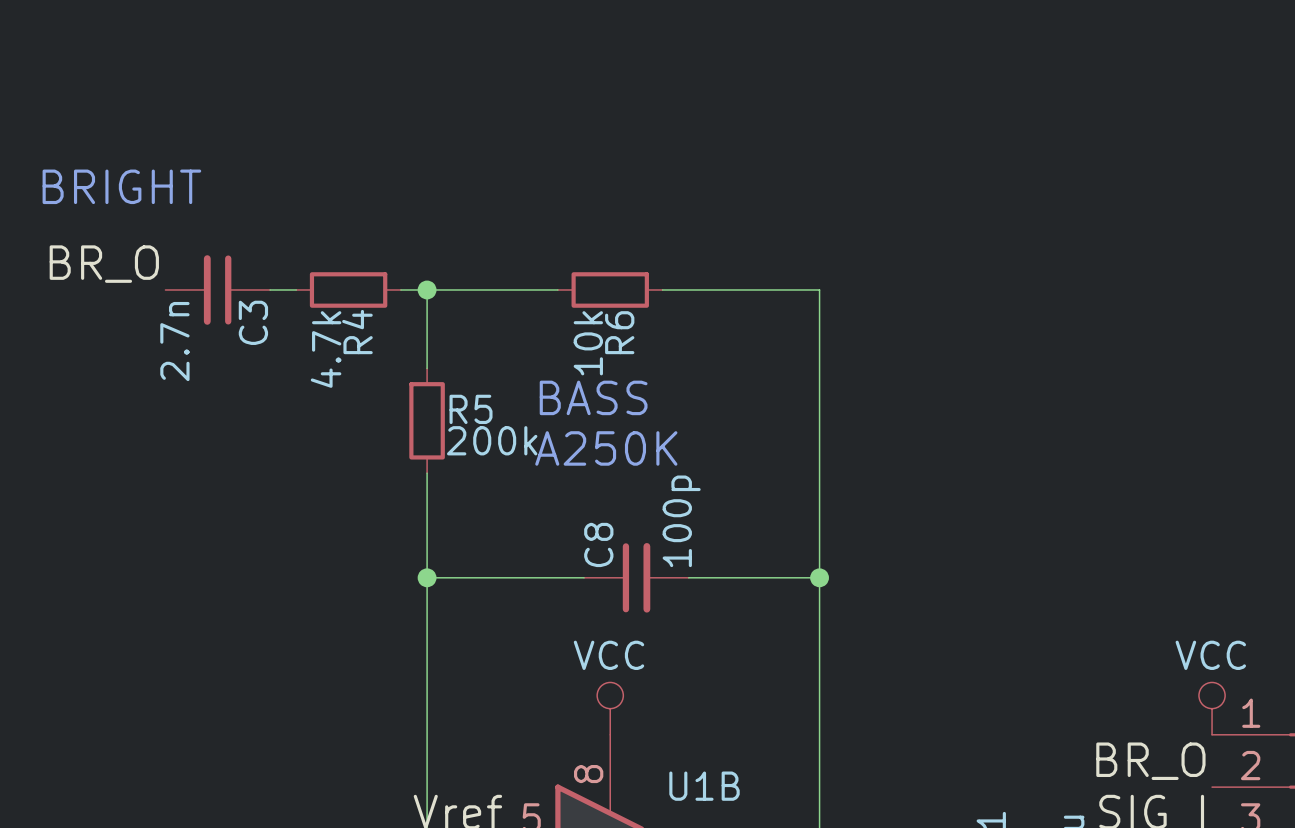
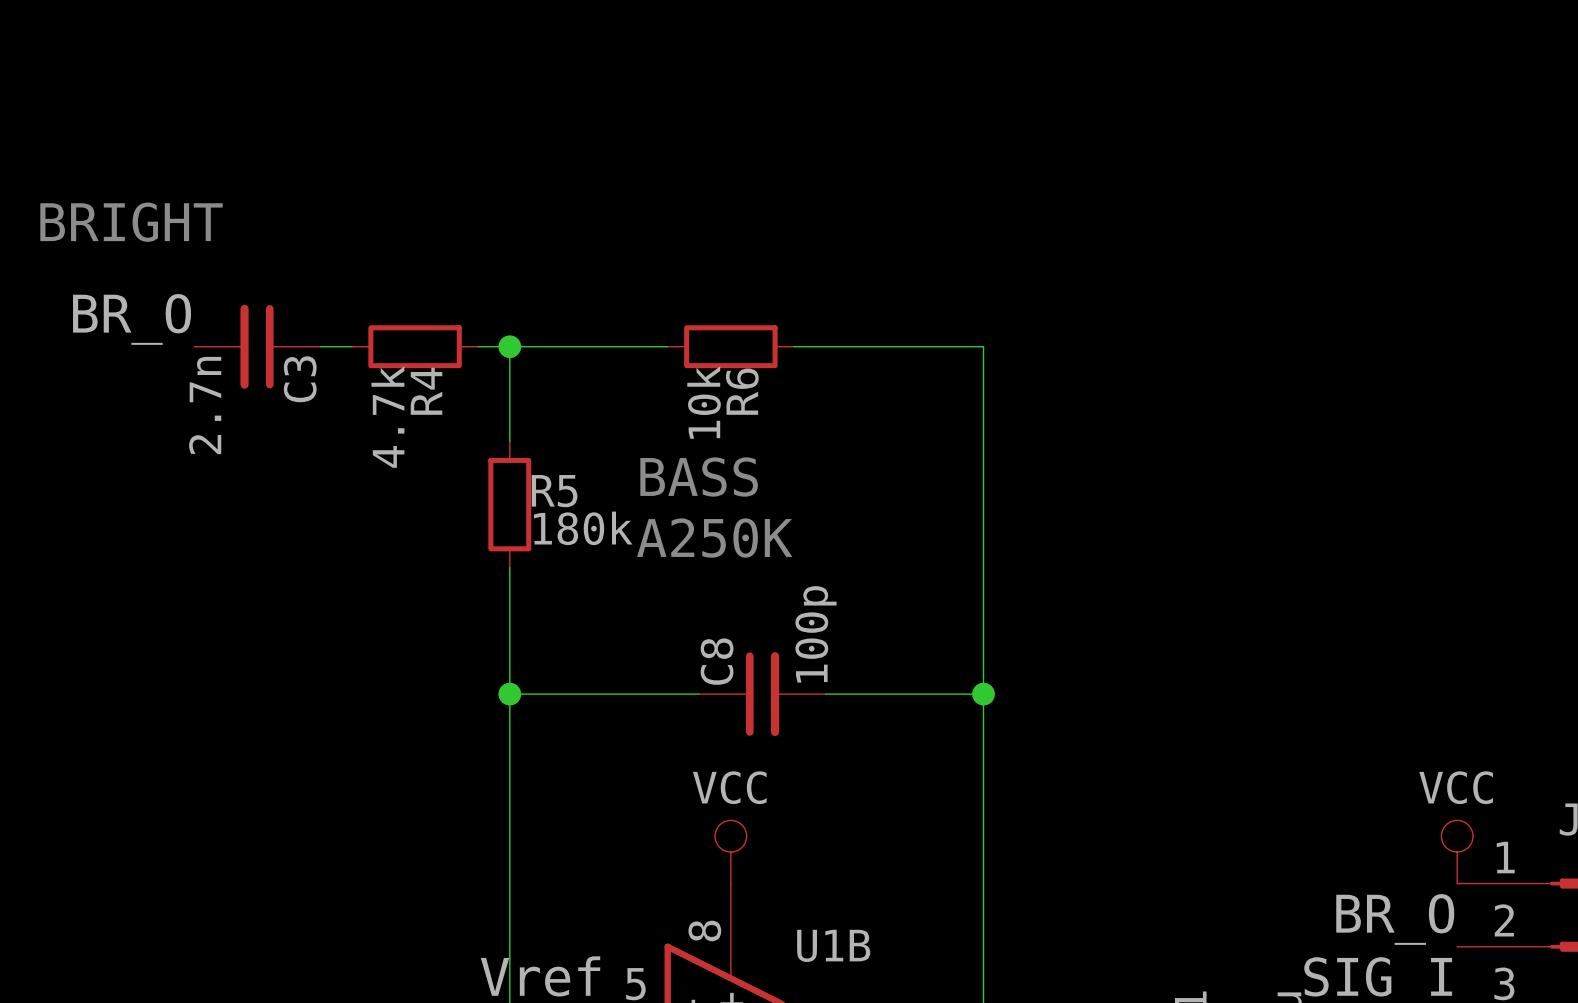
R5 value: 200k (492, 440) -> 180k (583, 528)

